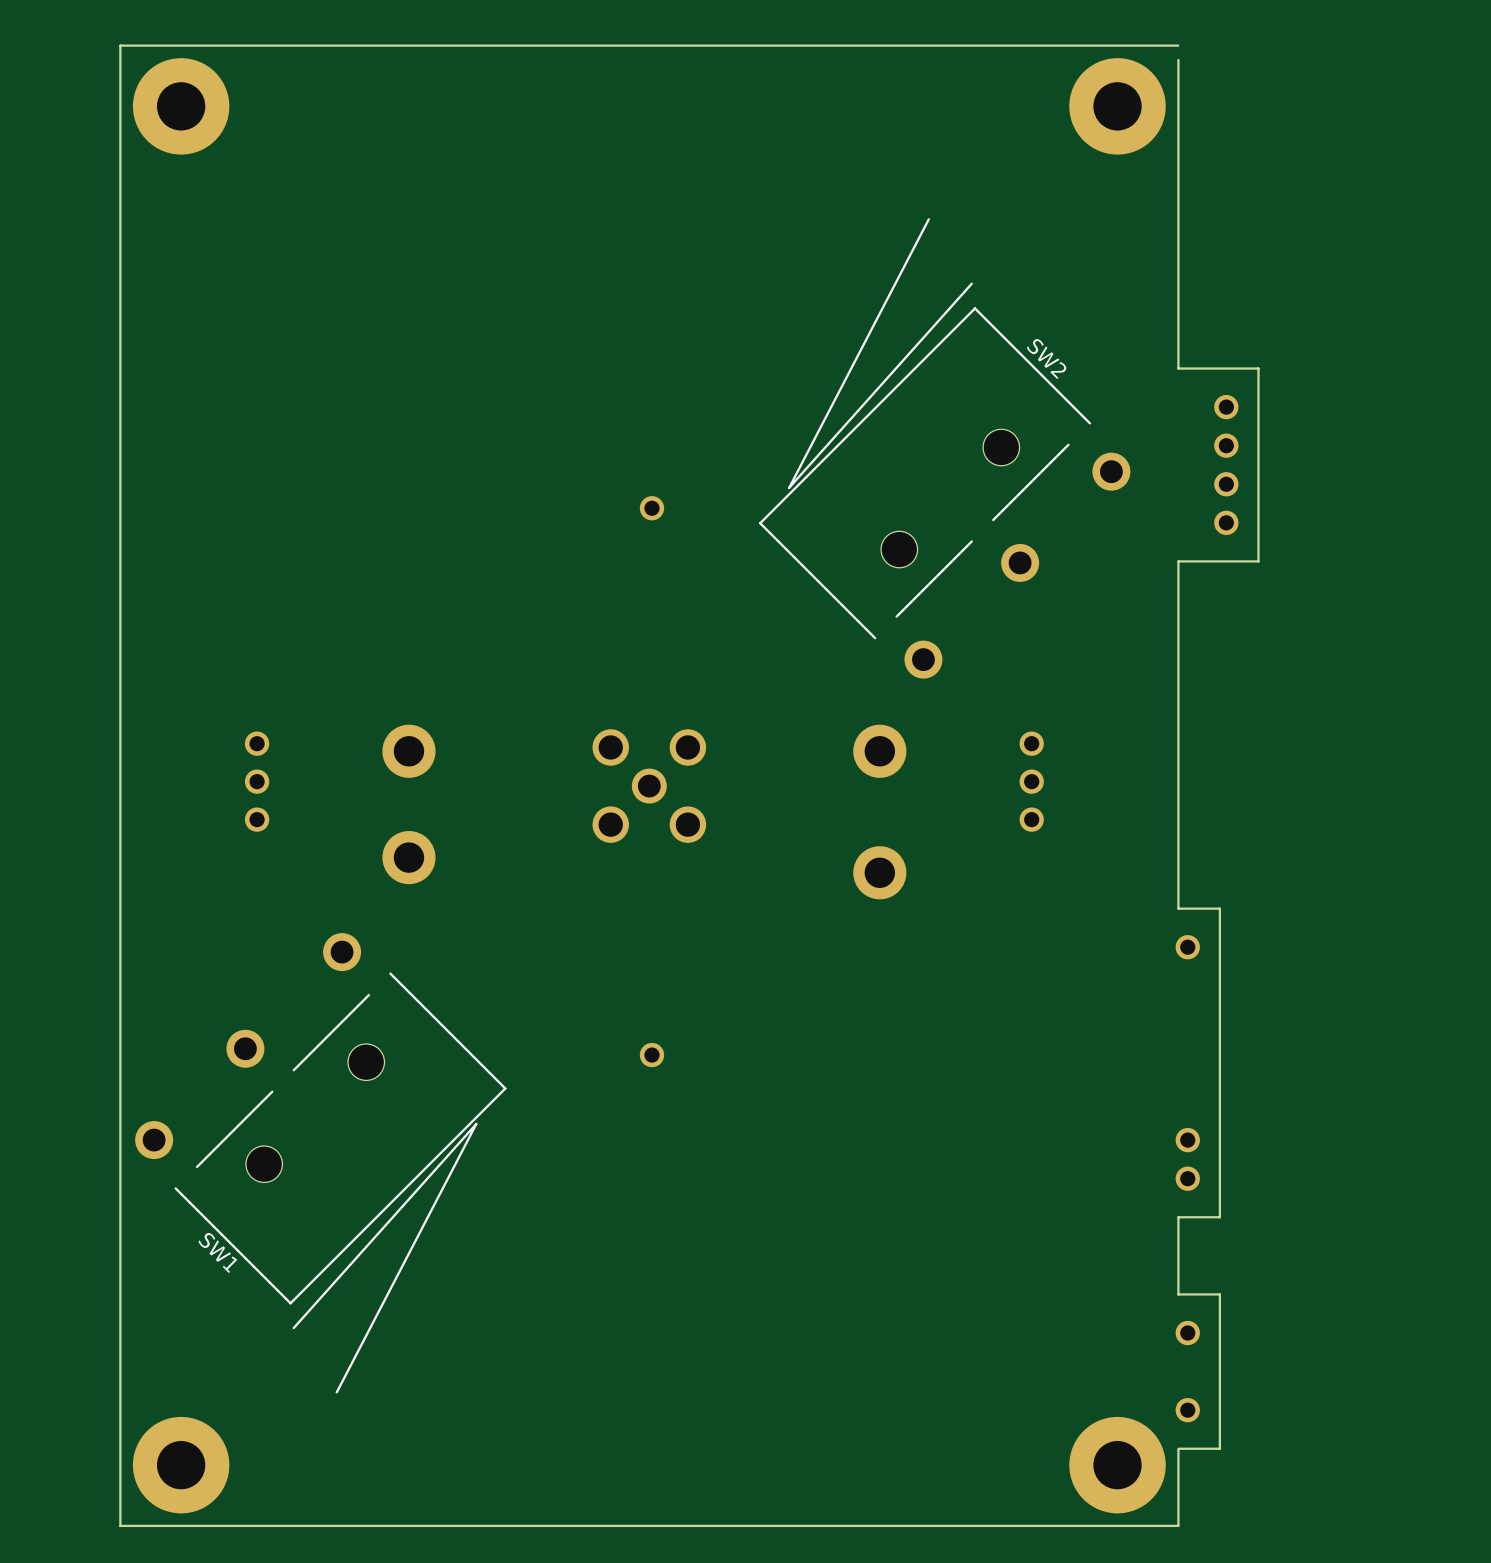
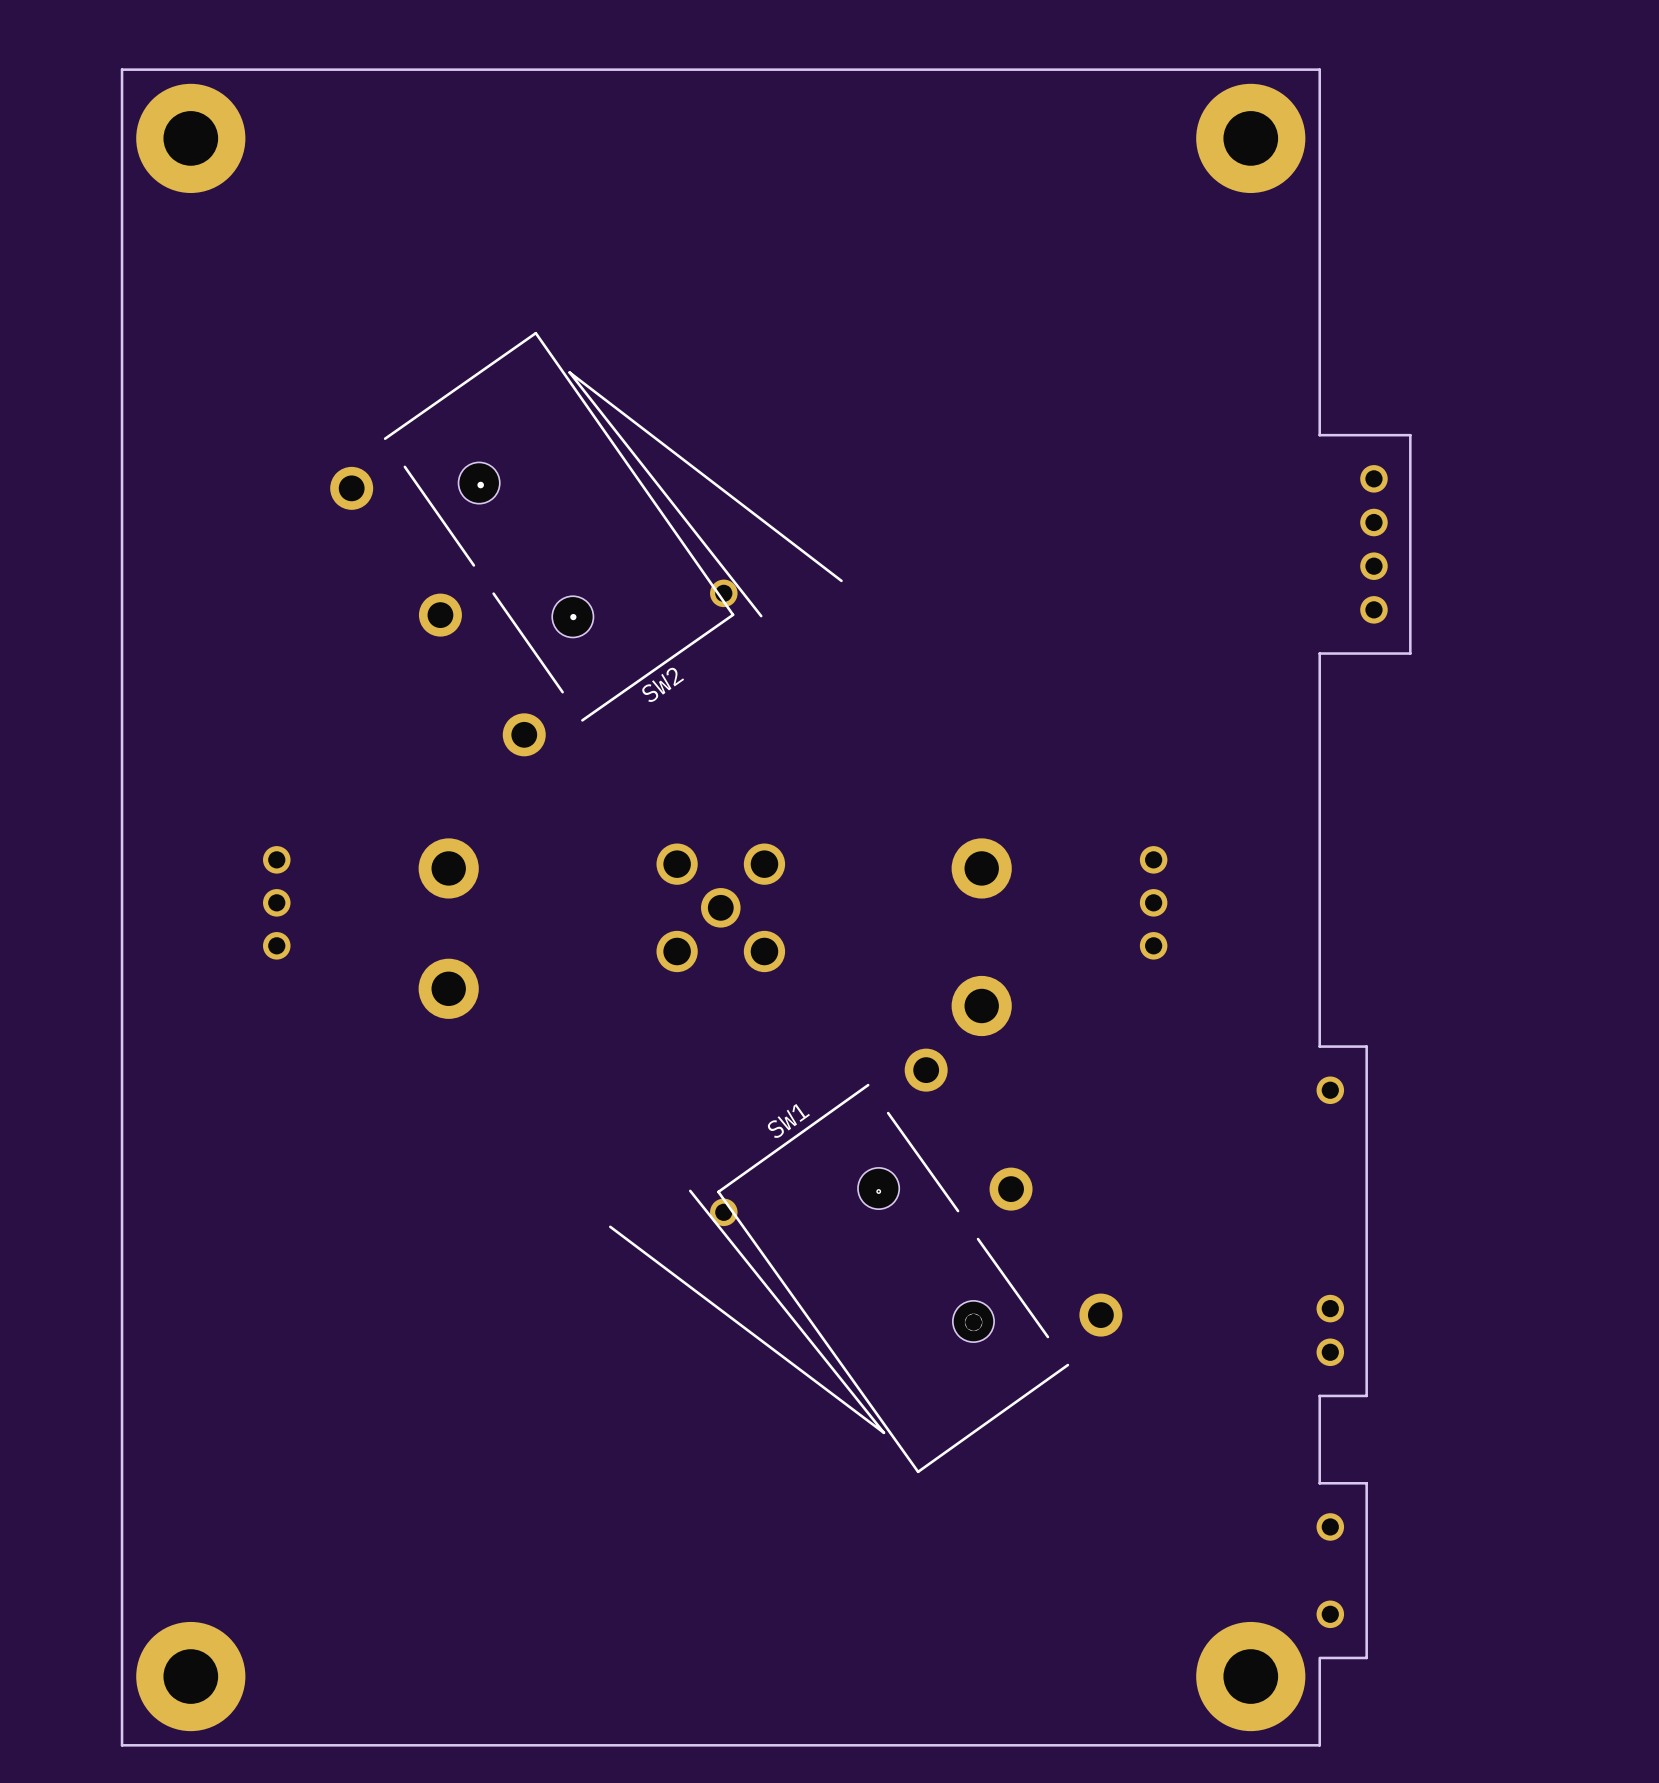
board edge: none -> (1319, 69) (1319, 85)
drawing: none -> [477, 481, 484, 489]
SW2 rotation: 0° (944, 448) -> 100° clockwise (586, 544)
SW2 position: (944, 448) -> (586, 544)
drawing: none -> [570, 613, 577, 621]
drawing: none -> [876, 1189, 882, 1194]
drawing: none -> [964, 1313, 983, 1332]
SW1 rotation: 0° (320, 1163) -> 99.5° clockwise (865, 1260)
SW1 position: (320, 1163) -> (865, 1260)

